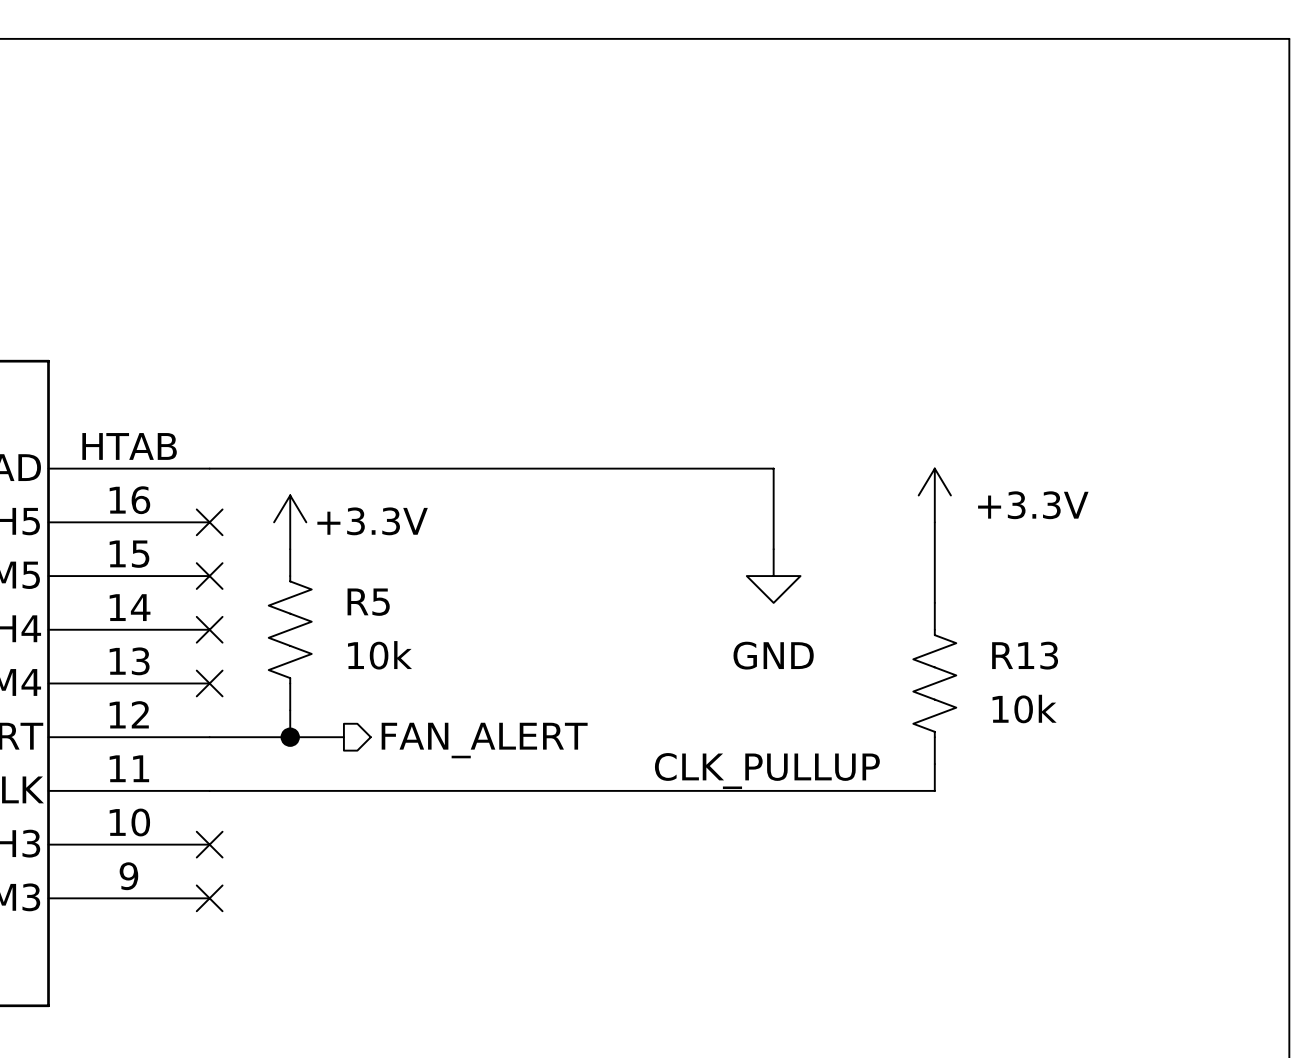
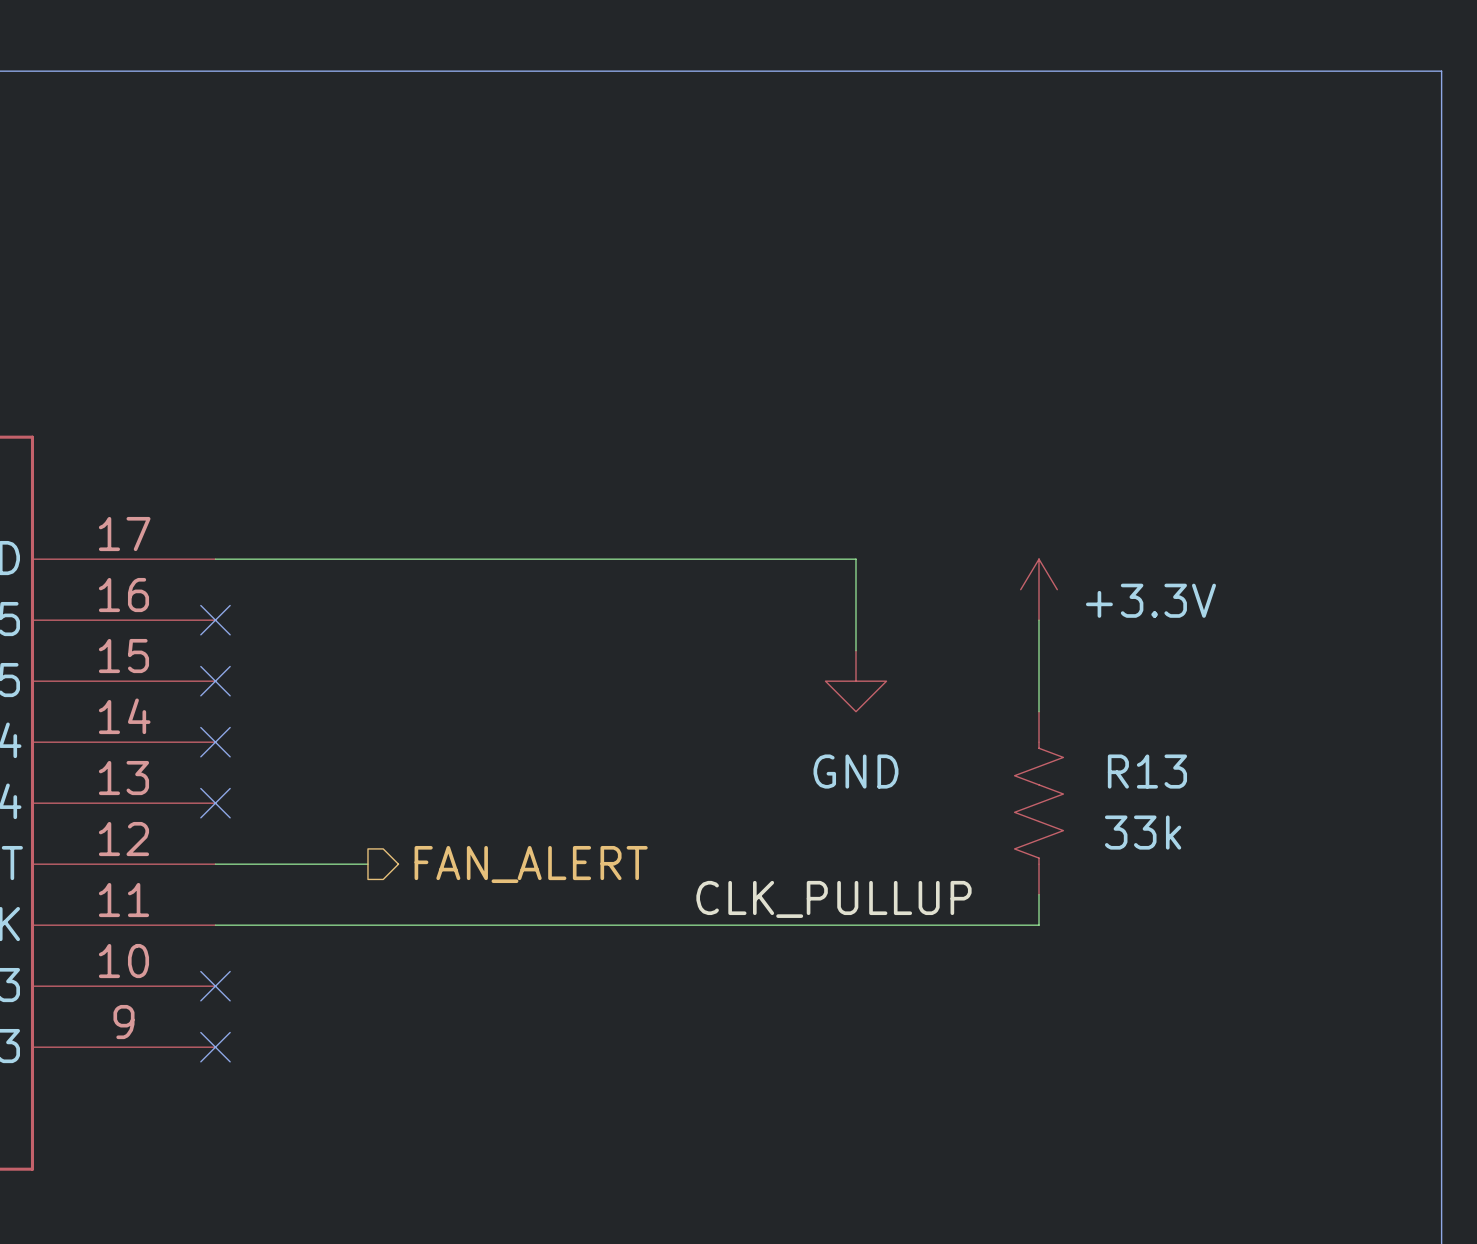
part pin number: HTAB (129, 446) -> 17 (124, 534)
power symbol: +3.3V (290, 522) -> none
R5: 10k (290, 629) -> none
R13 value: 10k (1024, 709) -> 33k (1143, 832)
wire: (290, 710) (290, 737) -> none
junction: (290, 737) -> none

